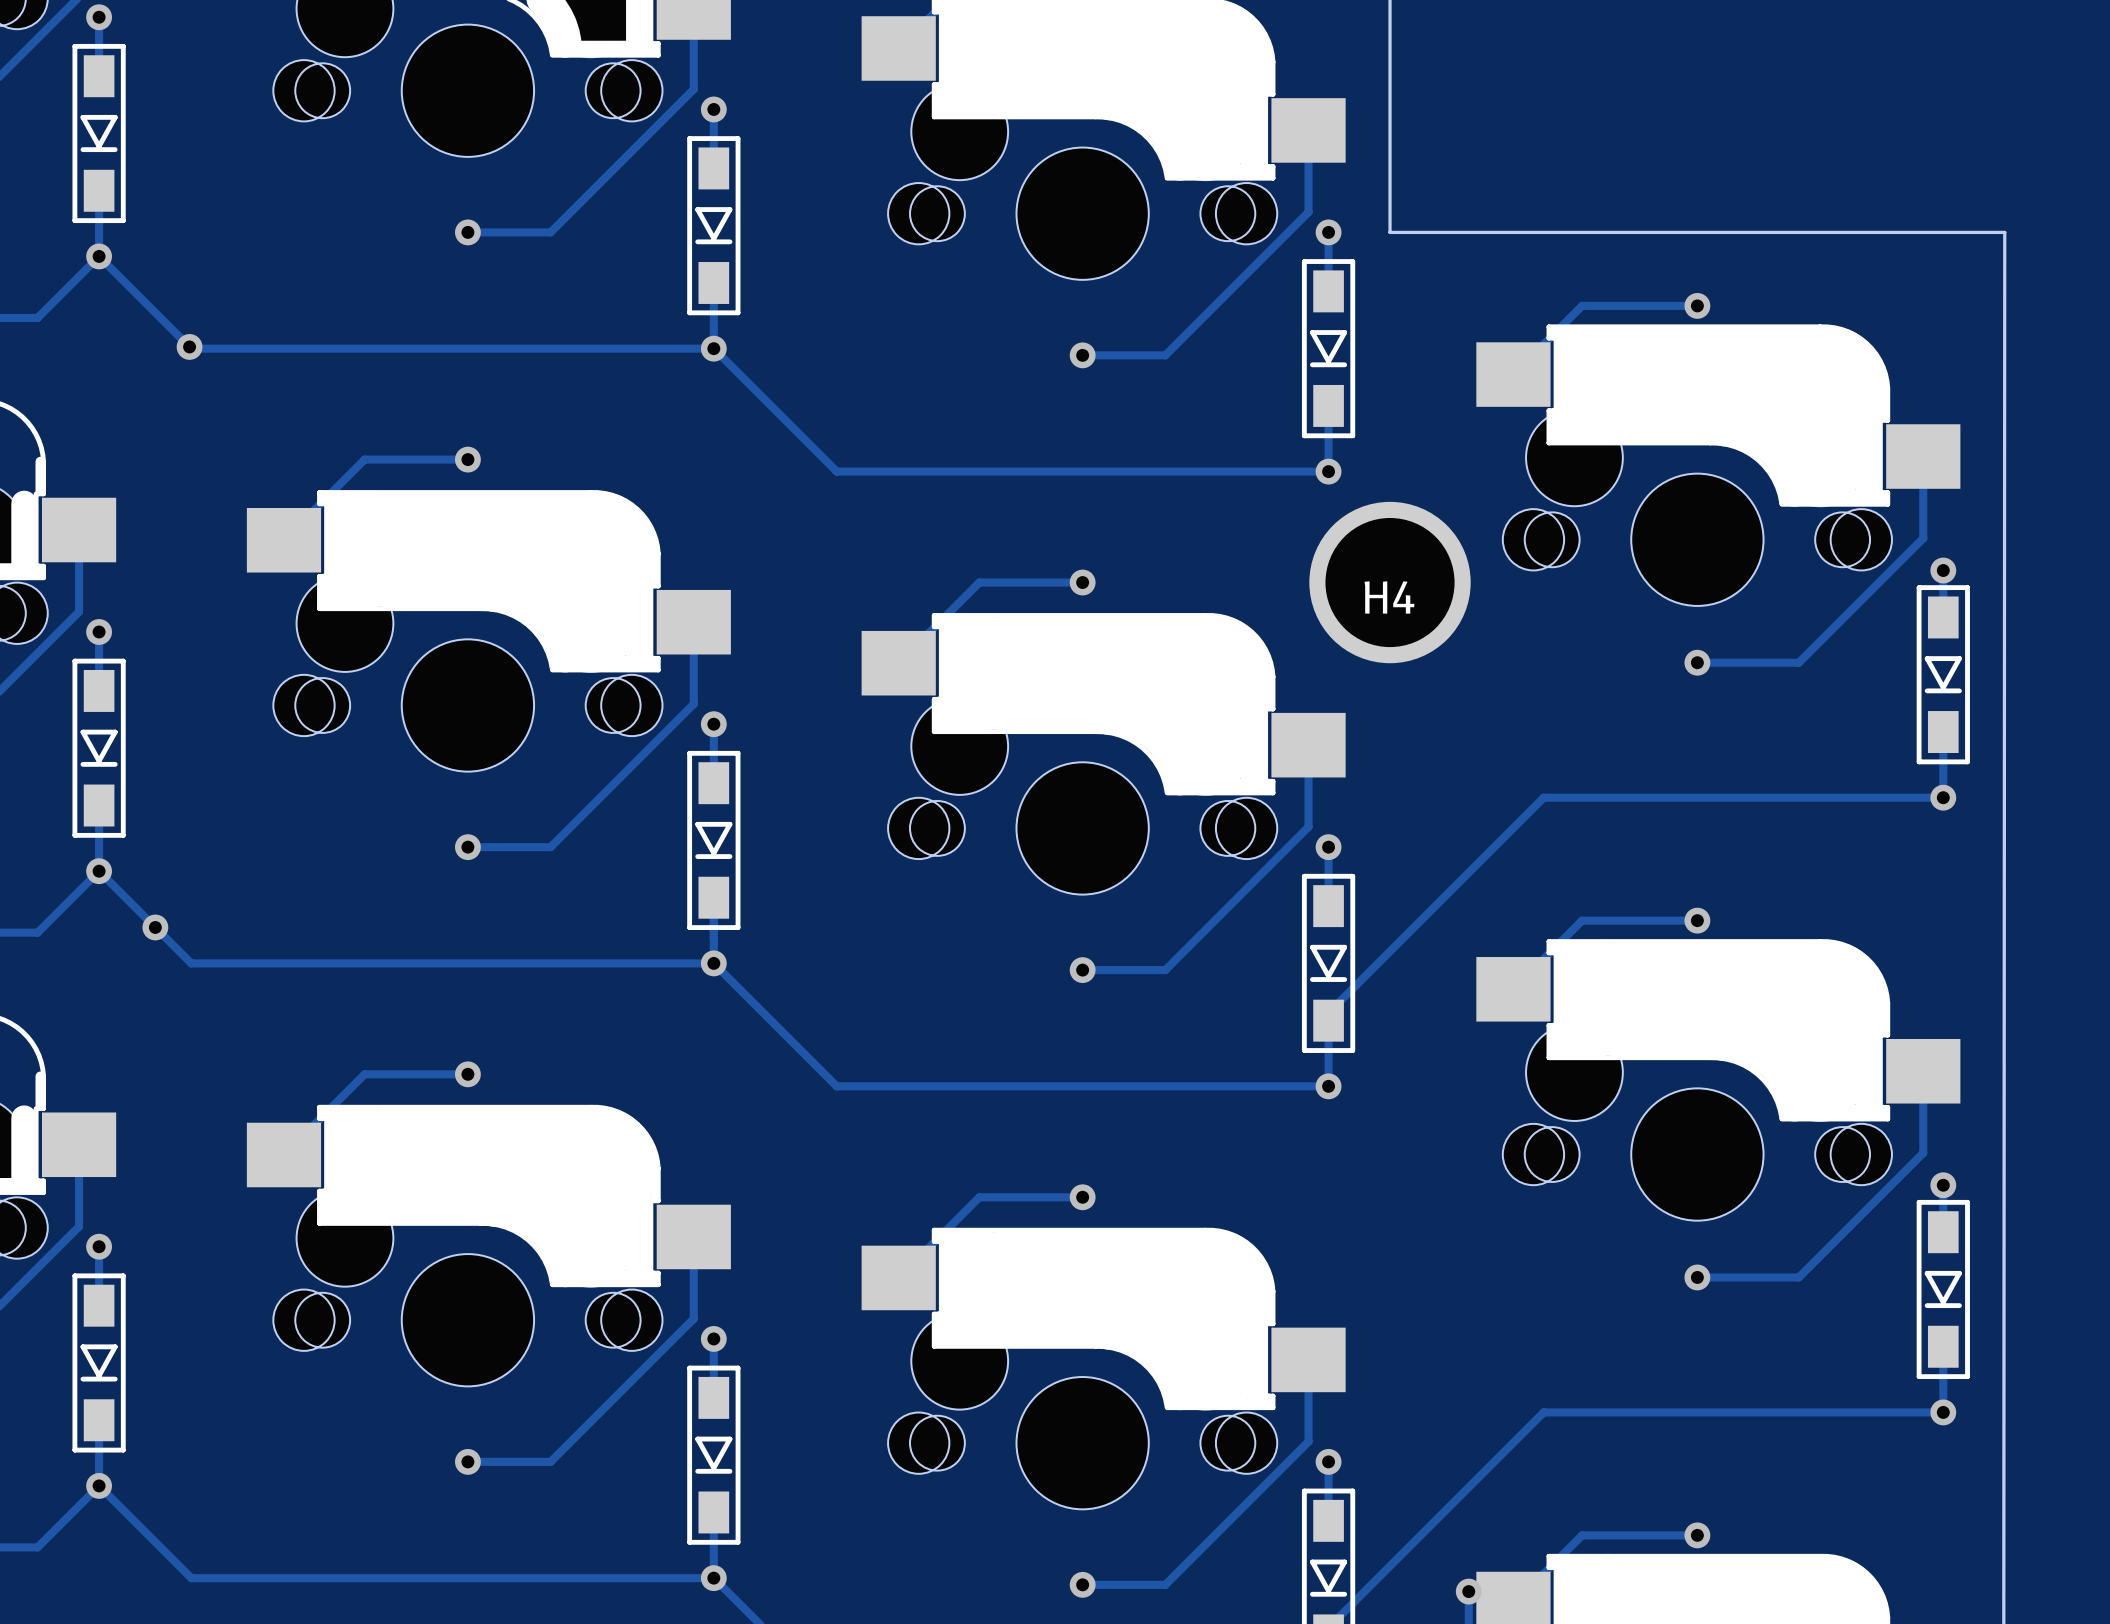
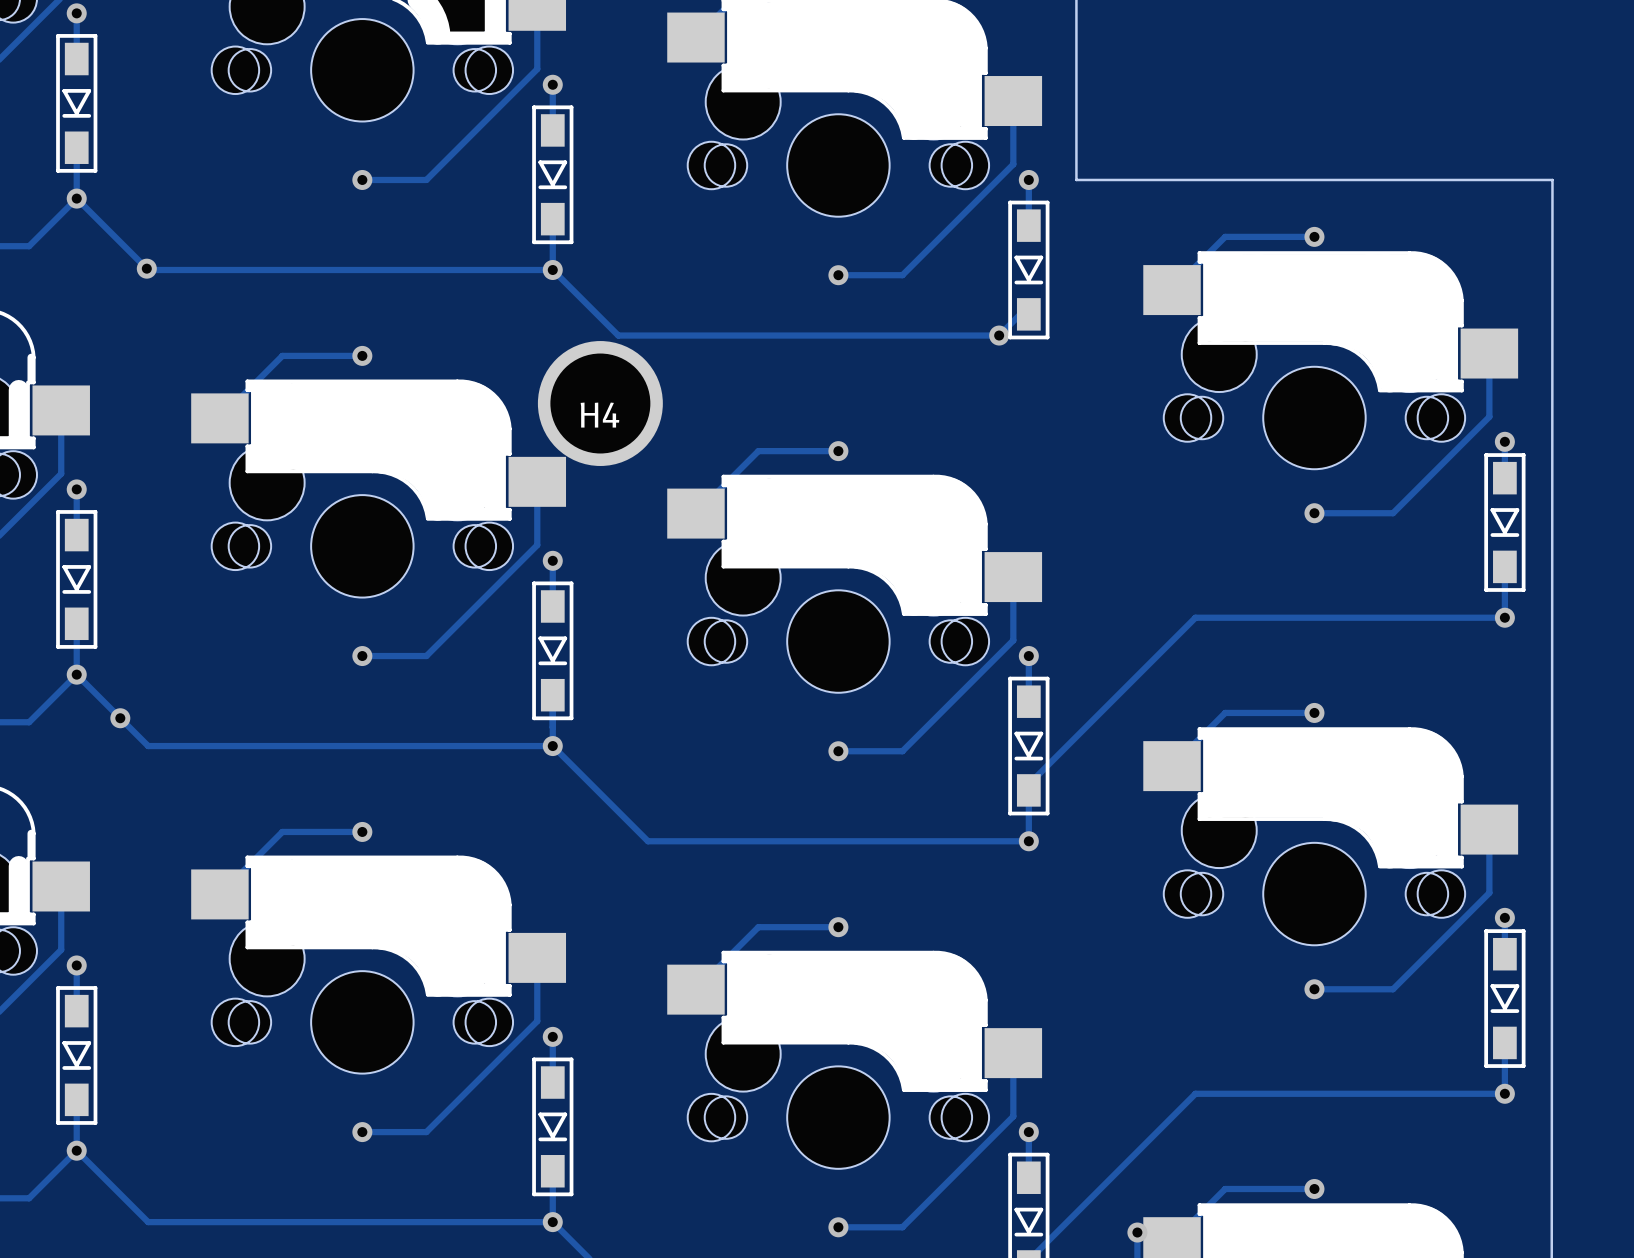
track: (1328, 405) (1328, 471) (836, 471) (798, 433) -> (1028, 314) (1020, 314) (999, 335) (618, 335)
via position: (1328, 471) -> (999, 335)
H4 position: (1390, 582) -> (600, 403)

